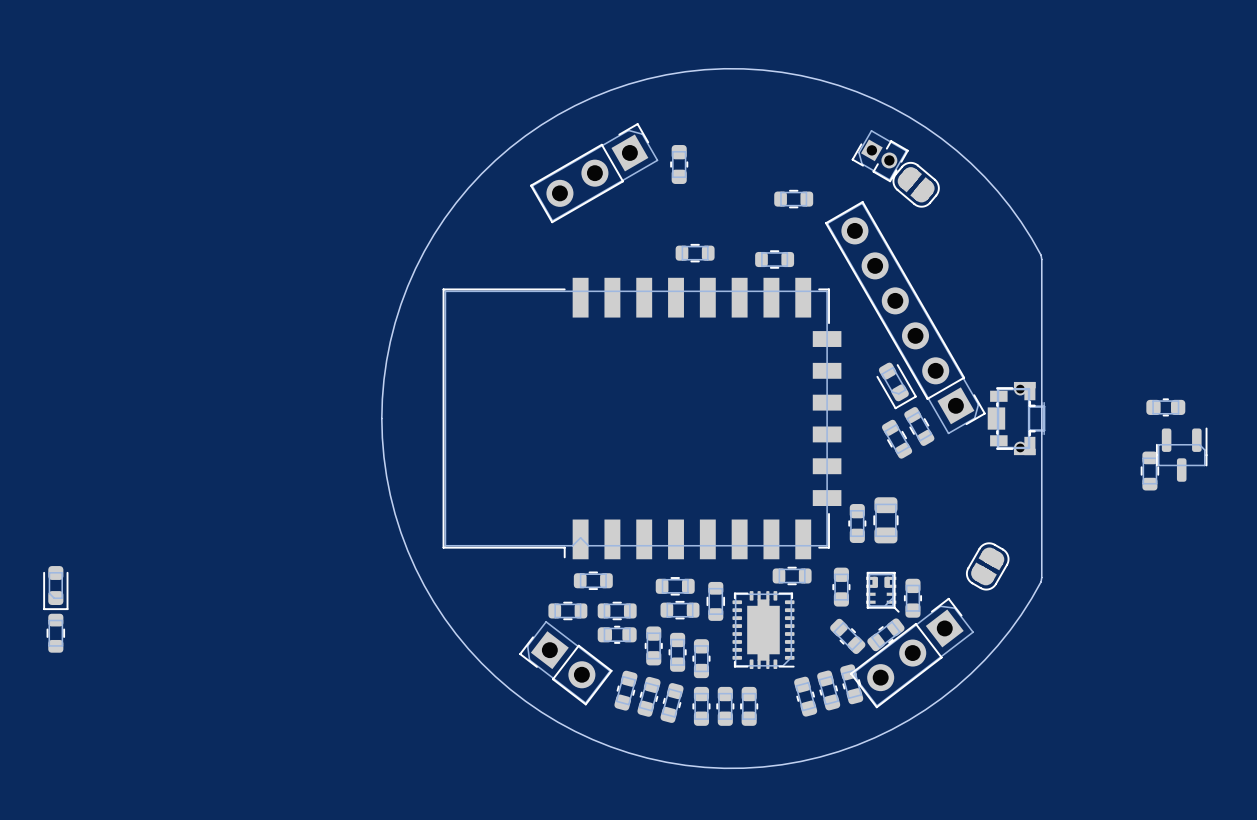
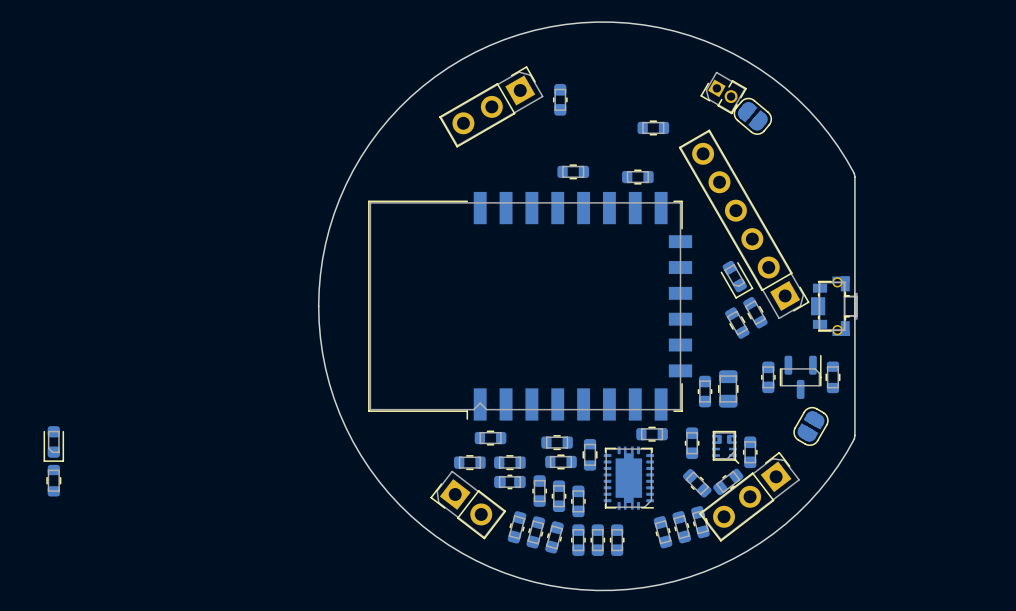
part rotation: 0° (1165, 407) -> 90° clockwise (768, 377)
part position: (1165, 407) -> (768, 377)
part position: (1181, 454) -> (800, 376)
part position: (1149, 471) -> (832, 377)

